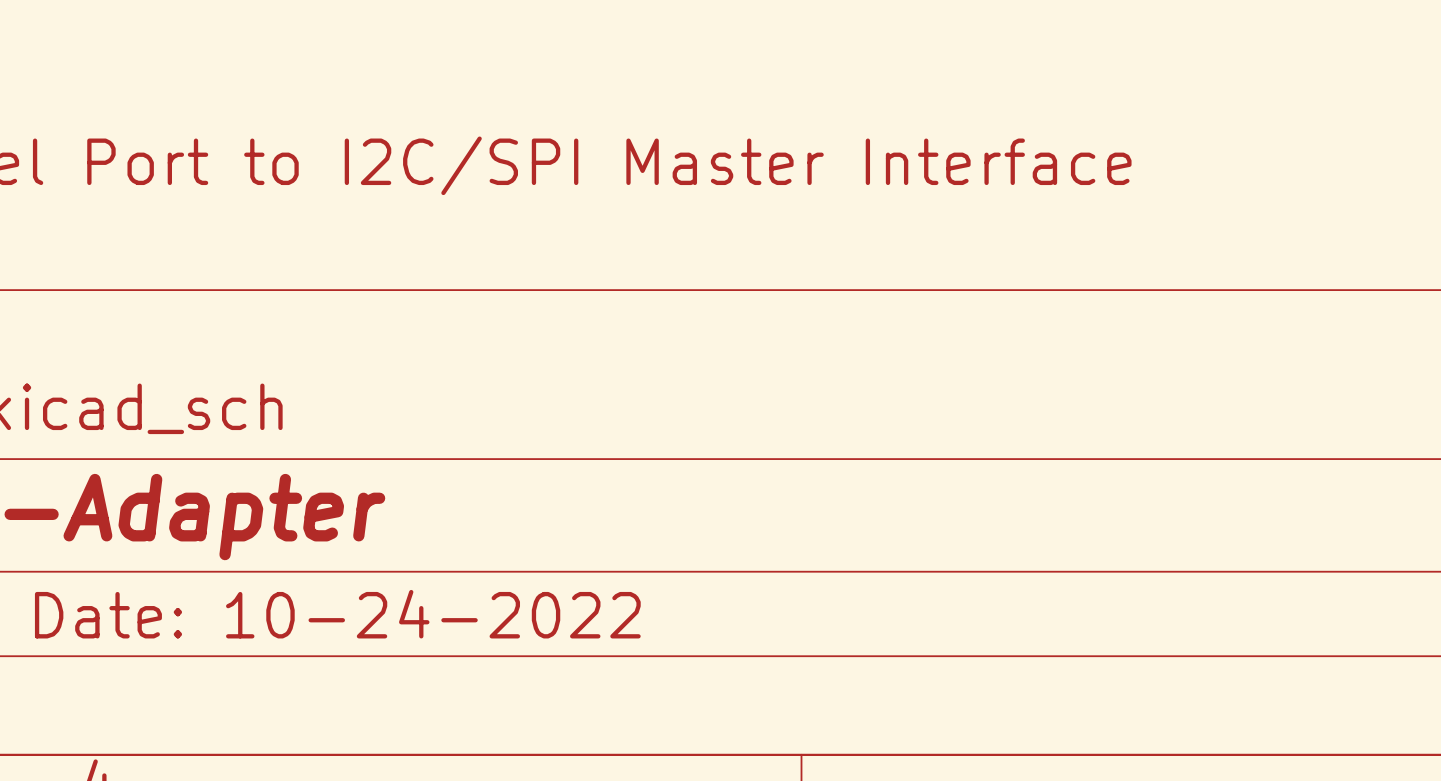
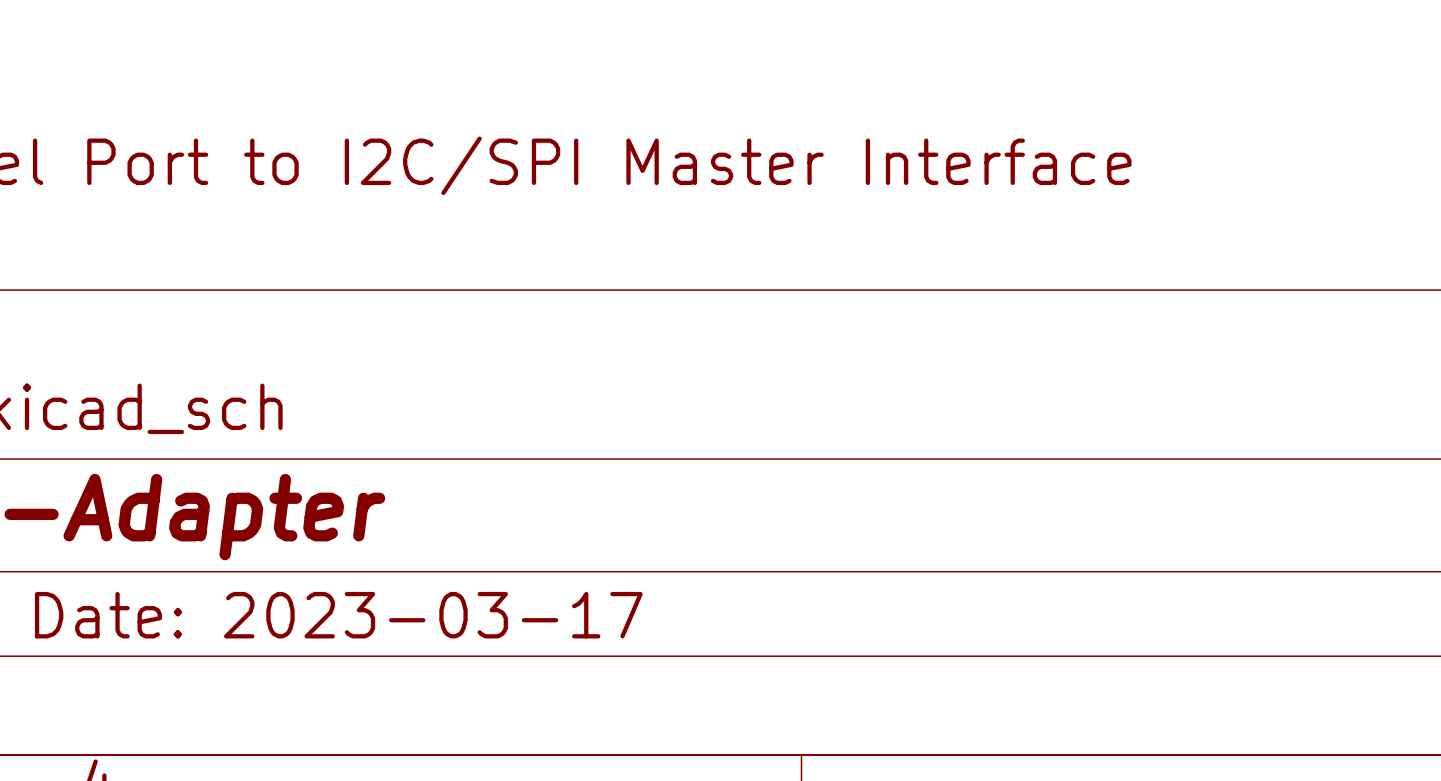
title block: Date: 10-24-2022 (337, 614) -> Date: 2023-03-17 (338, 615)

